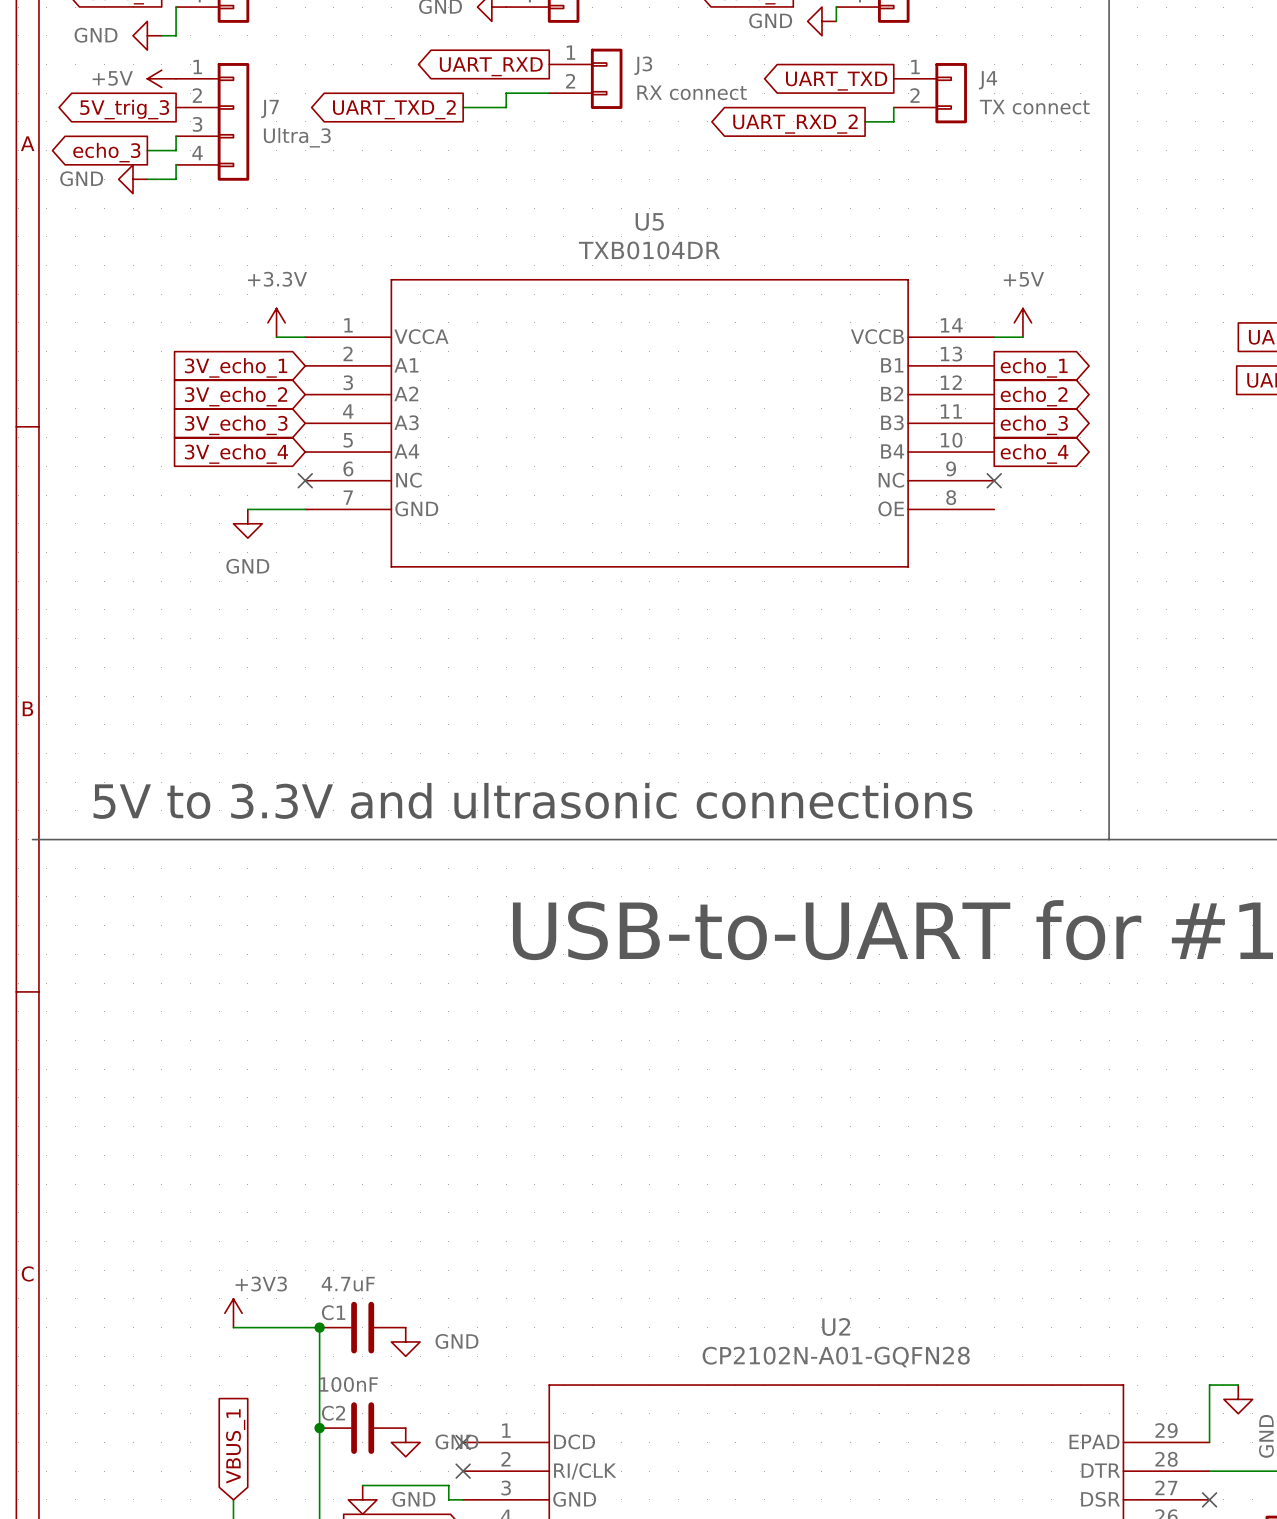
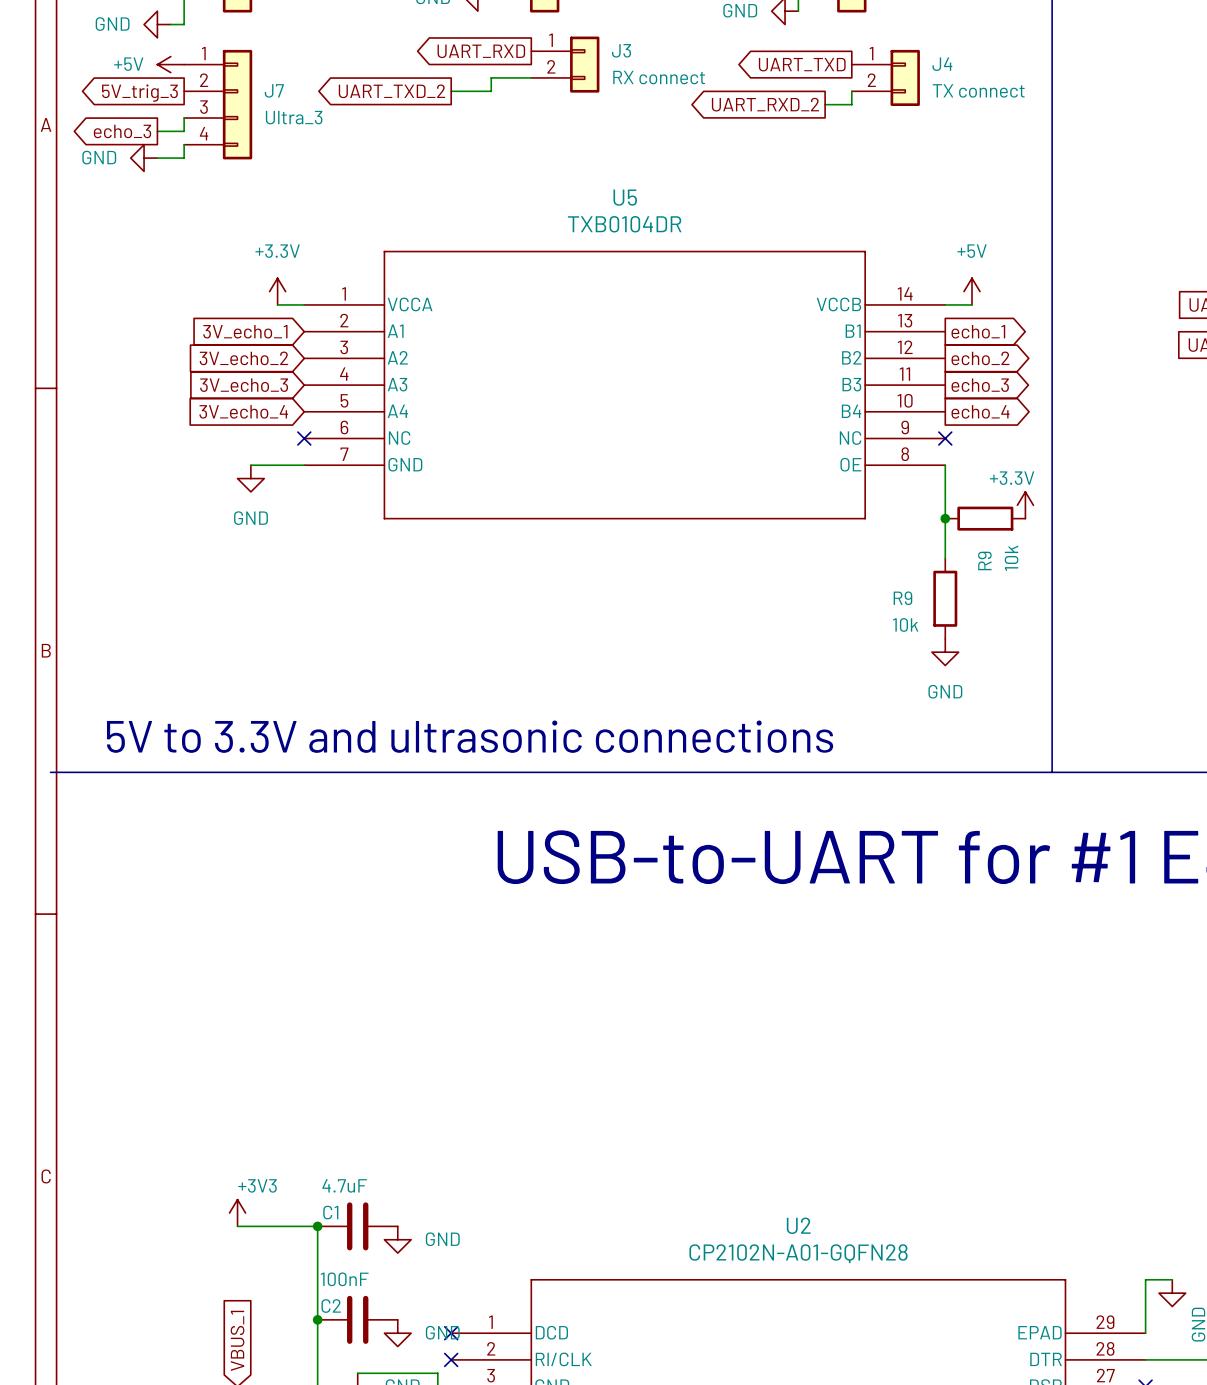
wire: none -> (945, 465) (945, 558)
power symbol: none -> +3.3V (1025, 505)
junction: none -> (945, 518)
R9: none -> 10k (985, 518)
R9: none -> 10k (945, 598)
power symbol: none -> GND (945, 652)

